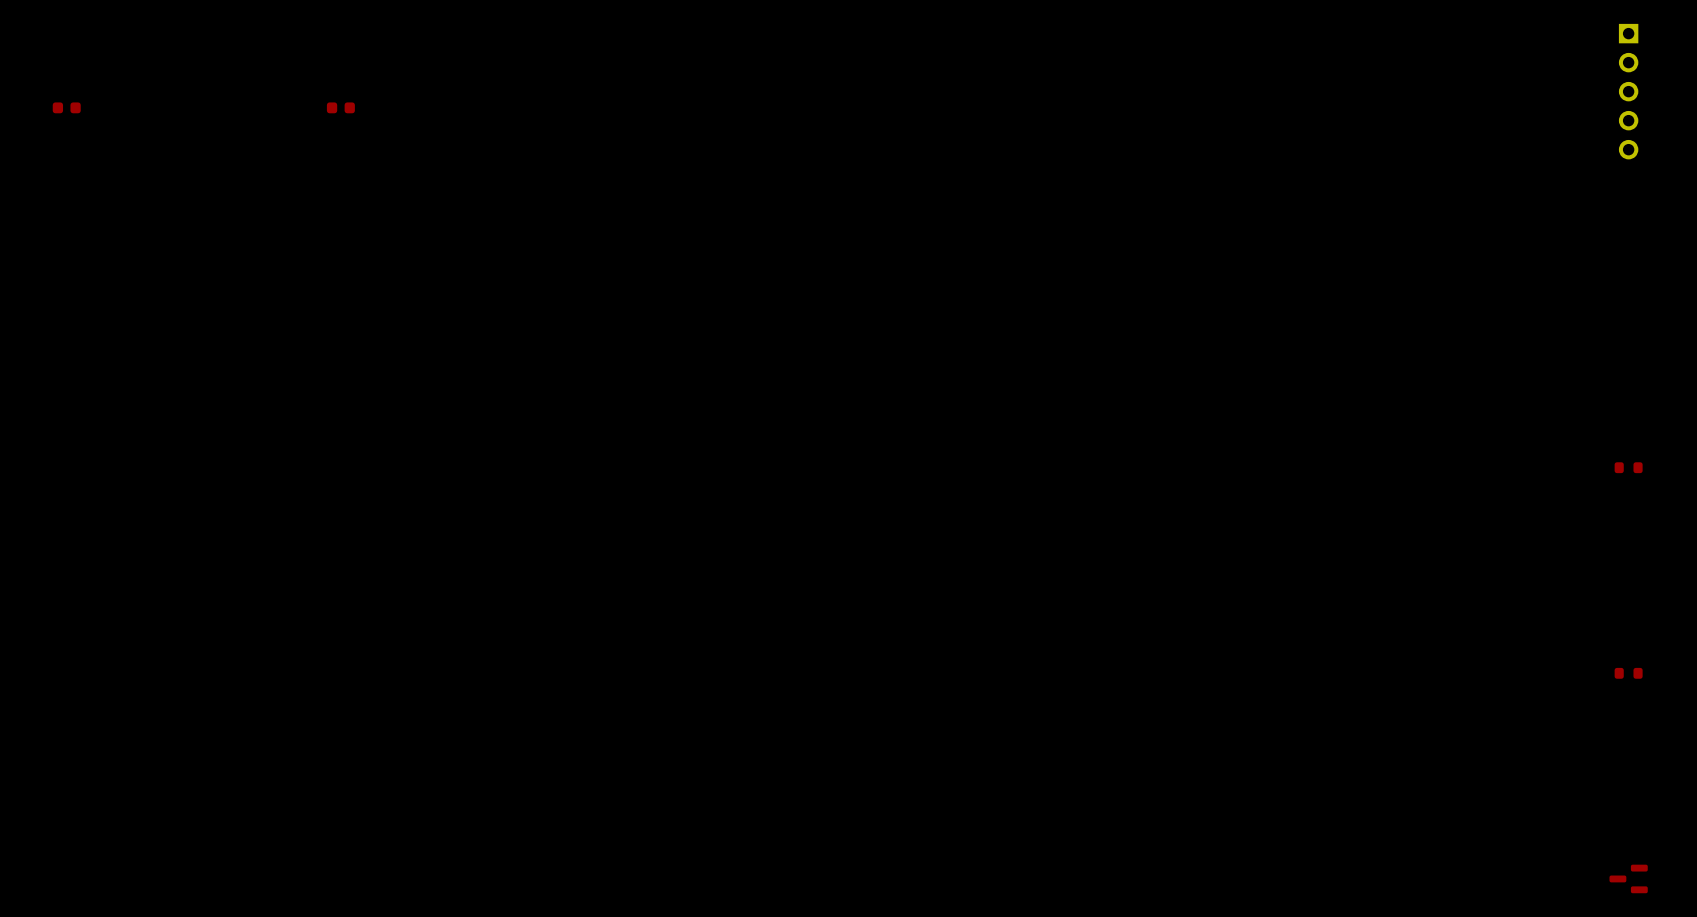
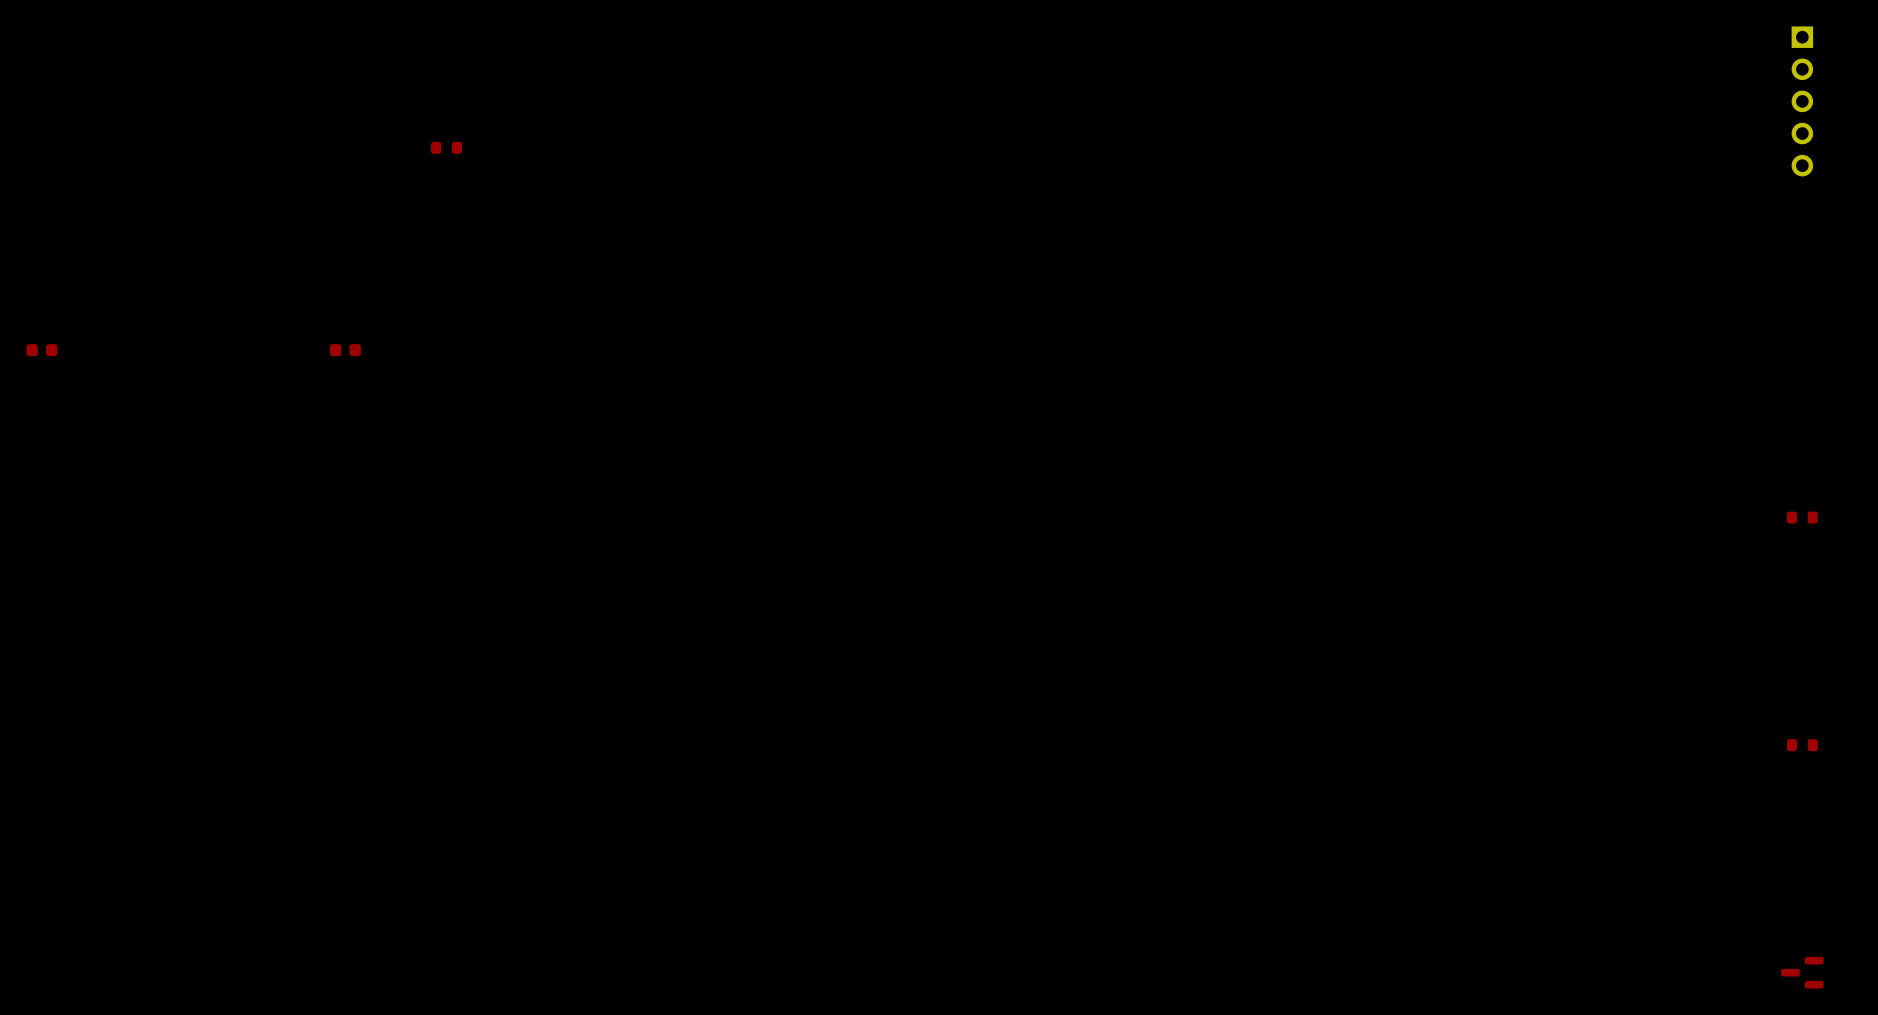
part: (66, 107) -> none
part: (340, 107) -> none
part: none -> (446, 147)
part: none -> (41, 350)
part: none -> (345, 350)

